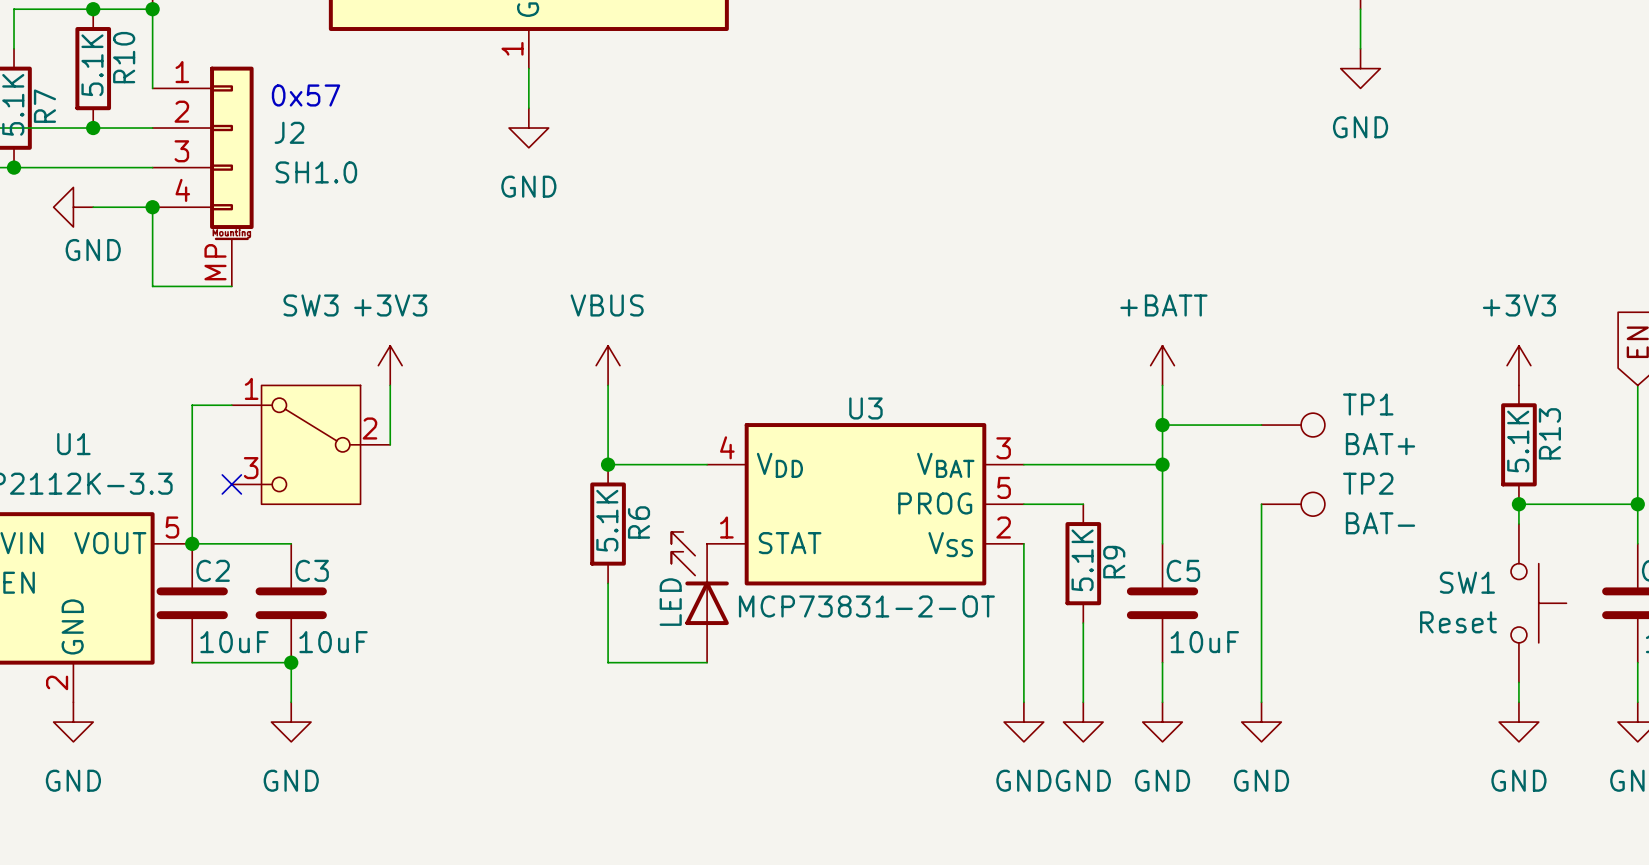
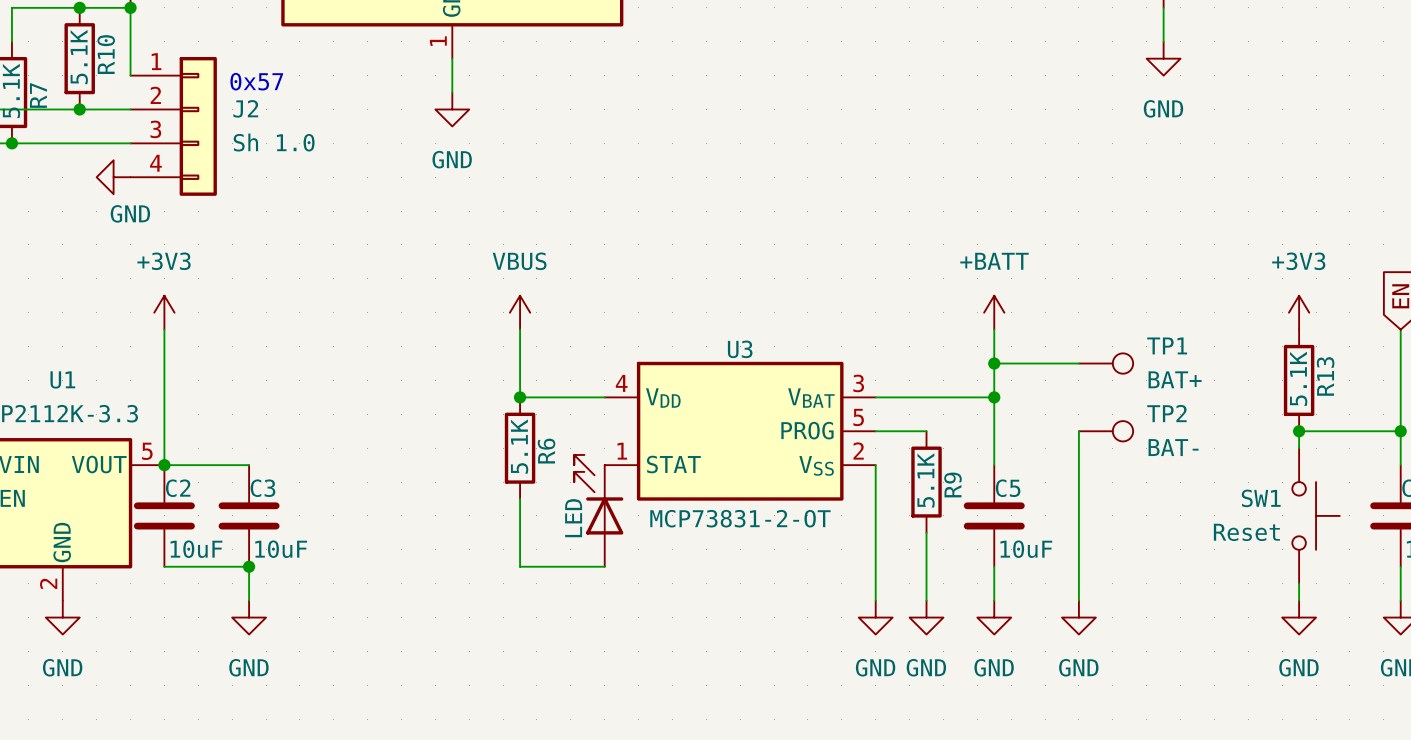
J2 symbol: [152, 66, 254, 287] -> [130, 56, 217, 196]
J2 value: SH1.0 (316, 172) -> Sh 1.0 (274, 142)
power symbol position: GND (73, 207) -> GND (113, 177)
wire: (93, 207) (152, 207) (152, 286) (231, 286) -> none
junction: (152, 207) -> none
power symbol position: +3V3 (390, 365) -> +3V3 (164, 312)
wire: (390, 385) (390, 444) -> none
wire: (192, 405) (231, 405) -> (164, 346) (164, 329)
SW3: (311, 444) -> none
no-connect mark: (231, 484) -> none

